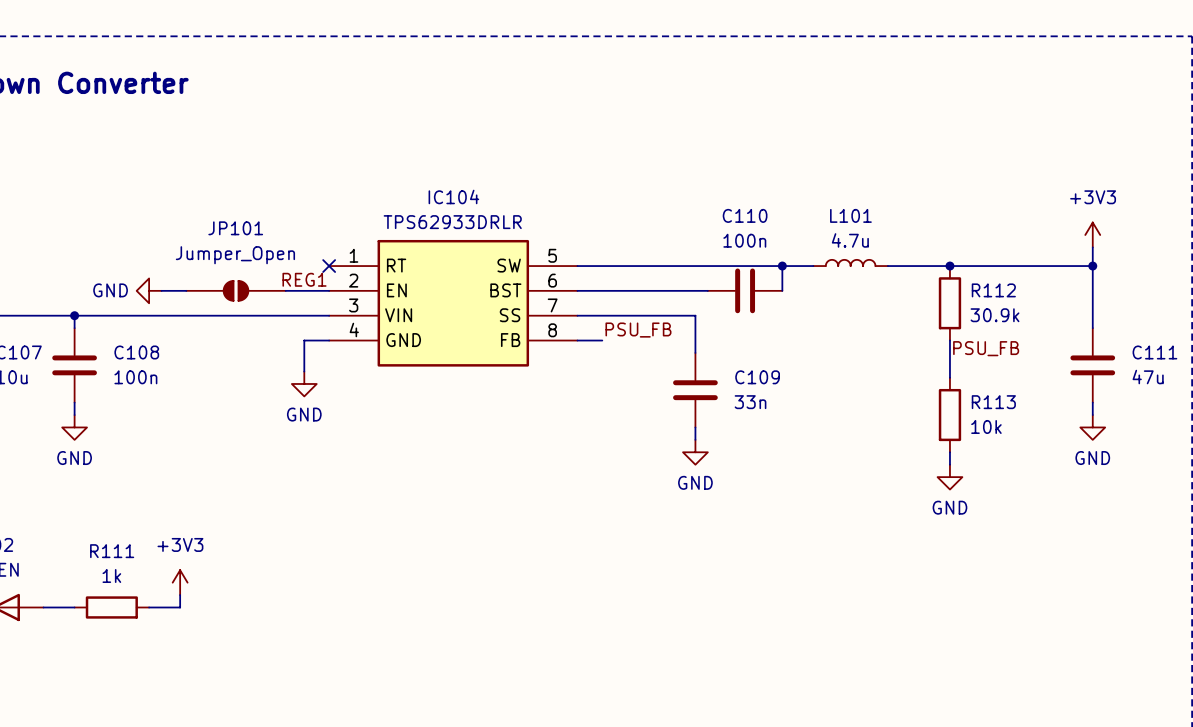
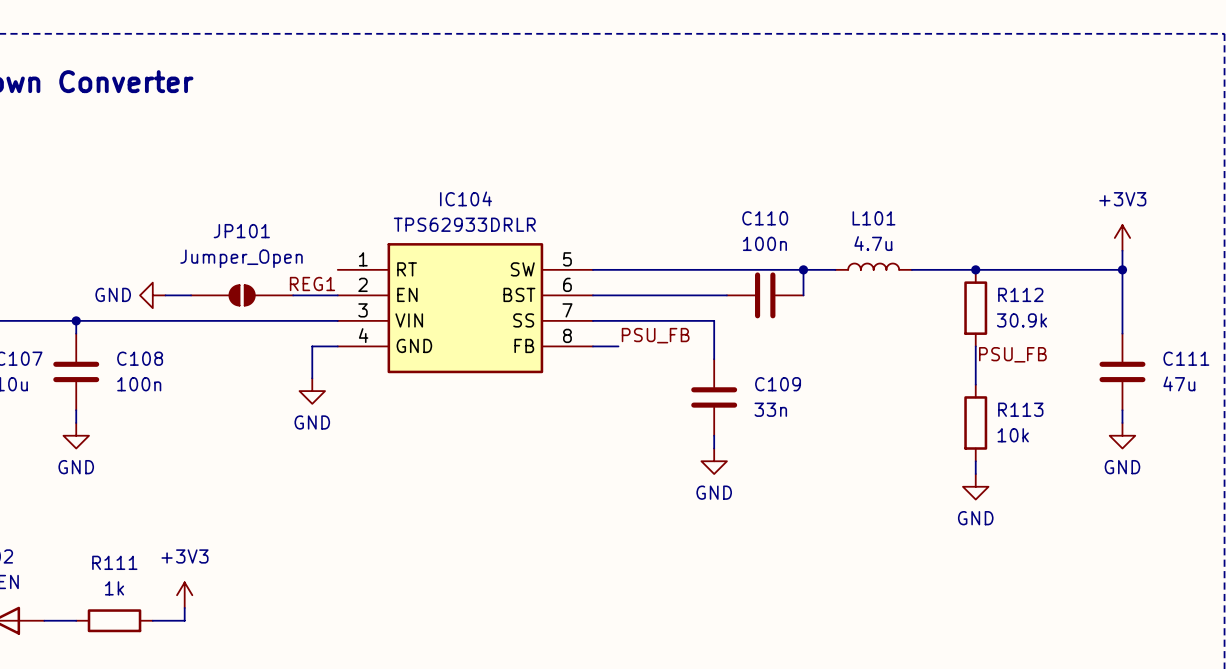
no-connect mark: (329, 266) -> none

